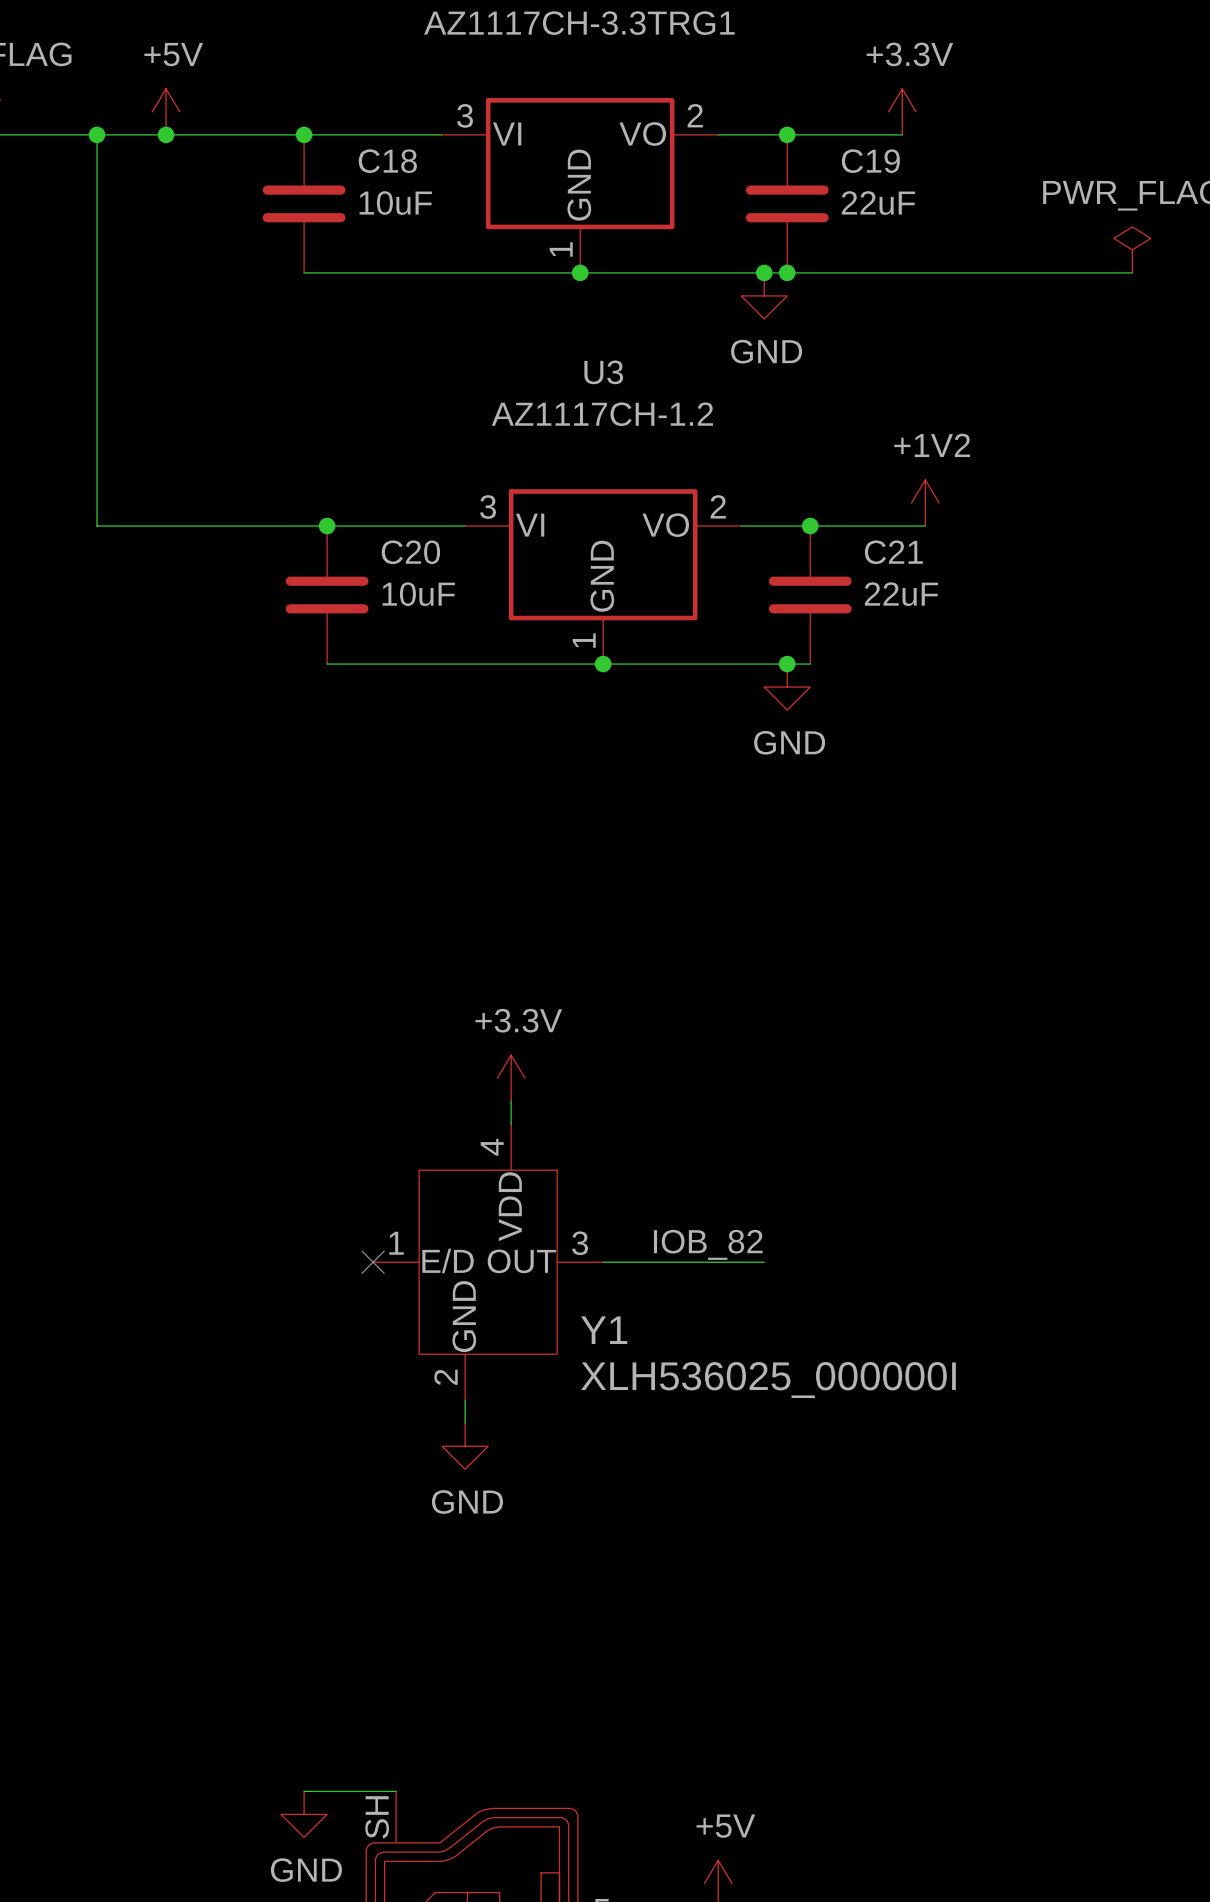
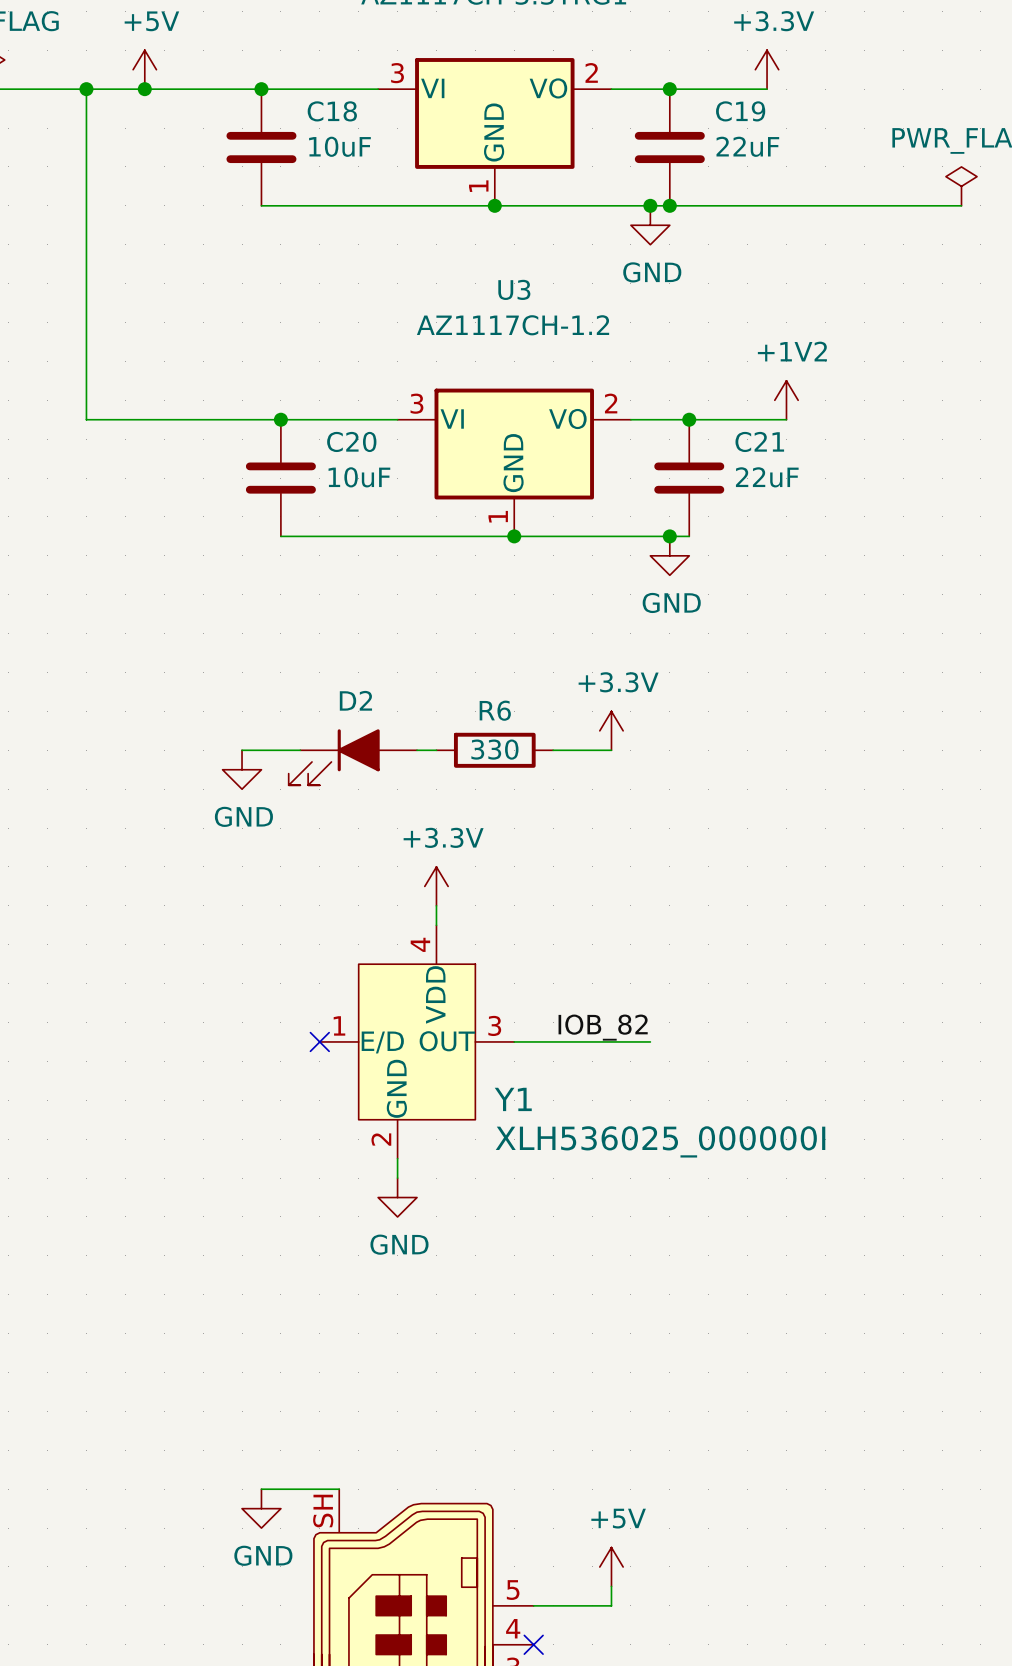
power symbol: none -> +3.3V (611, 730)
wire: none -> (242, 750) (300, 750)
wire: none -> (417, 750) (436, 750)
R6: none -> 330 (494, 750)
wire: none -> (553, 750) (611, 750)
D2: none -> (352, 757)
power symbol: none -> GND (242, 769)

